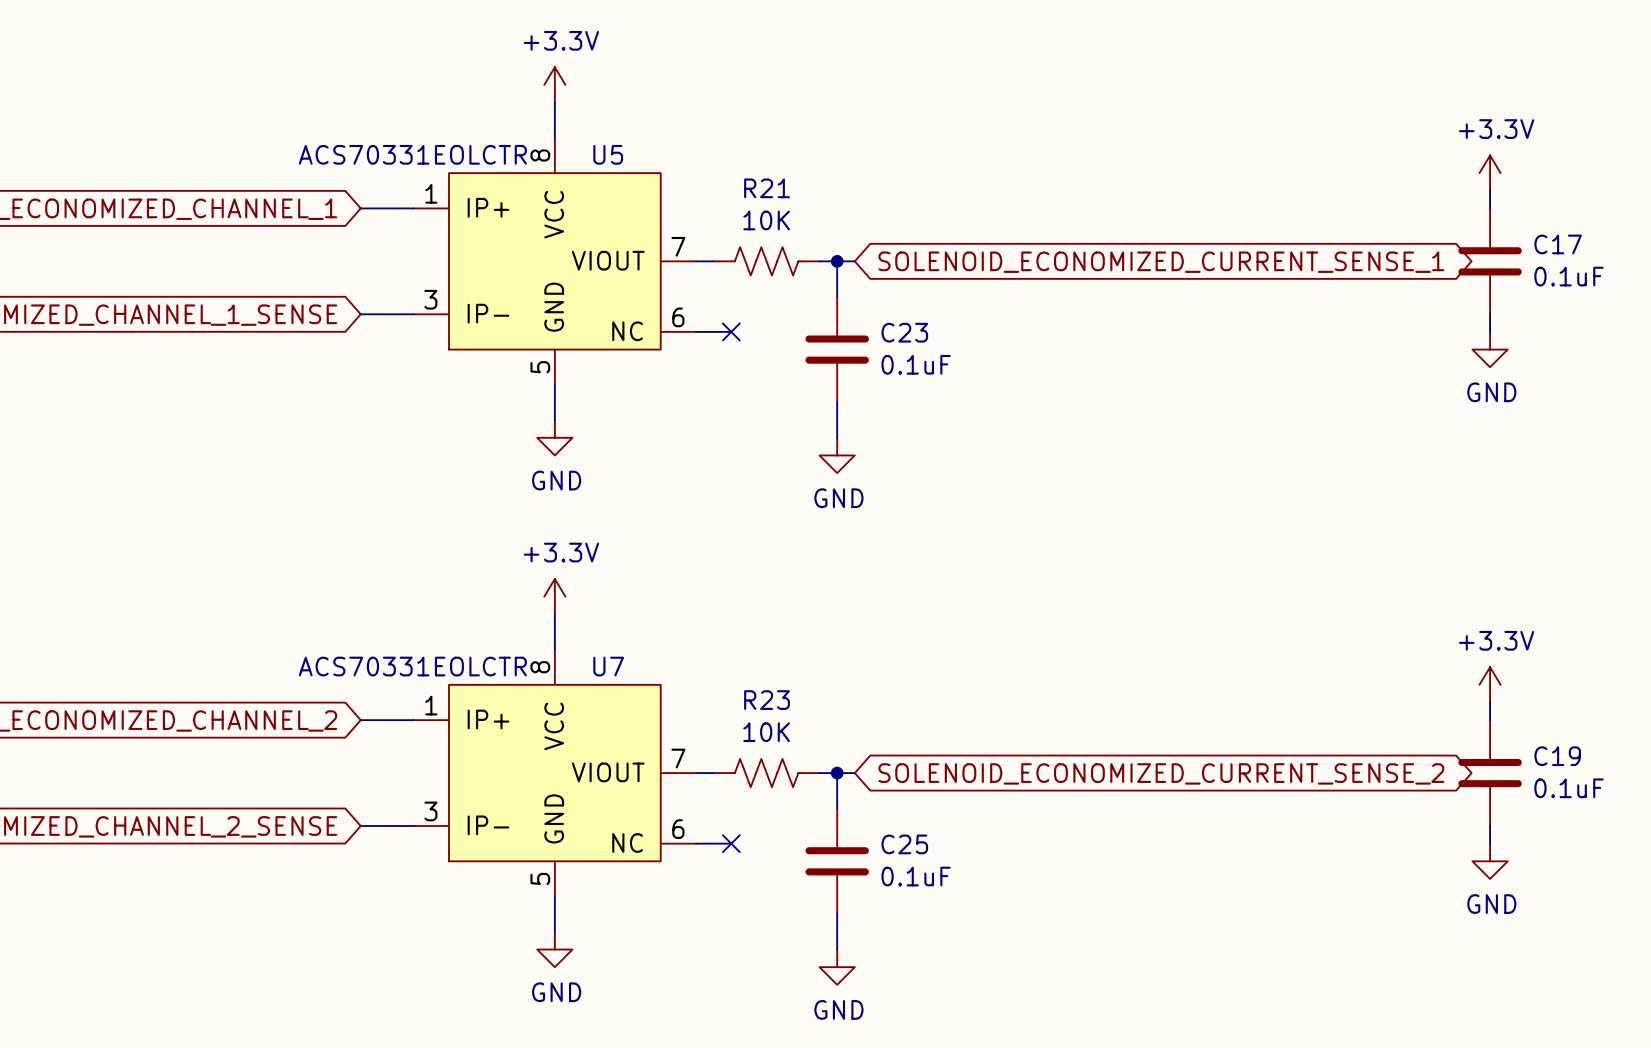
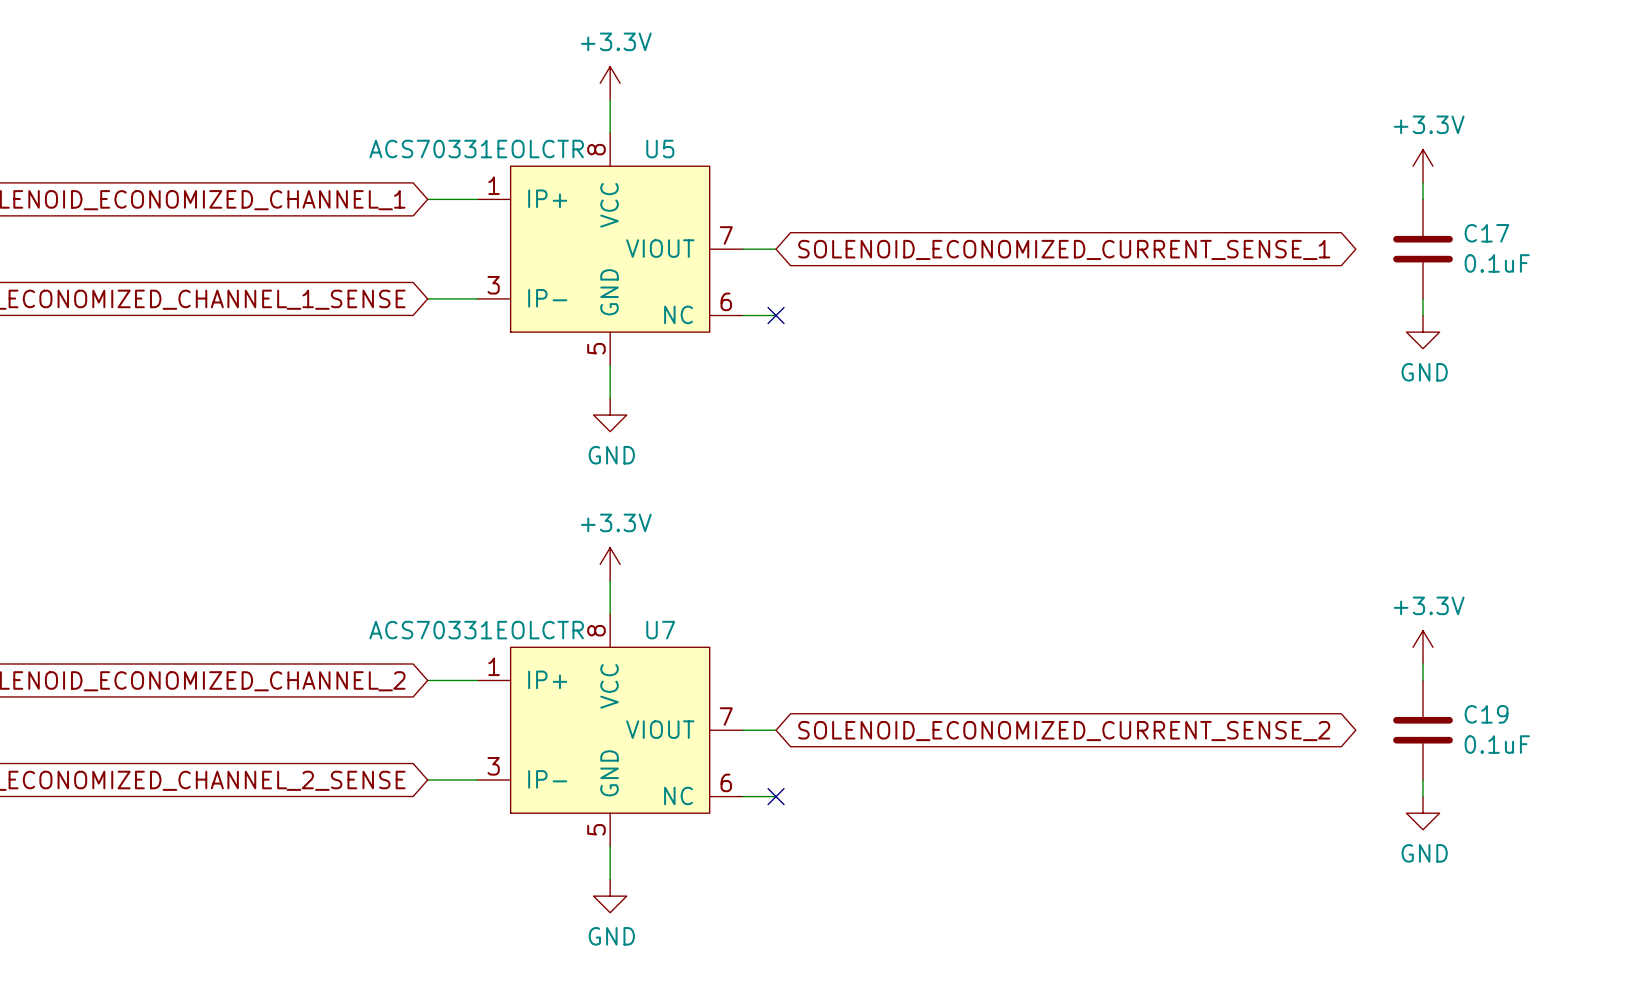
power symbol position: +3.3V (1490, 173) -> +3.3V (1423, 166)
wire: (1490, 190) (1490, 208) -> (1423, 182) (1423, 199)
R21: 10K (766, 261) -> none
wire: (819, 261) (854, 261) -> none
wire: (837, 261) (837, 296) -> none
junction: (837, 261) -> none
C17 position: (1490, 261) -> (1423, 249)
global label position: SOLENOID_ECONOMIZED_CURRENT_SENSE_1 (1161, 262) -> SOLENOID_ECONOMIZED_CURRENT_SENSE_1 (1064, 249)
wire: (1490, 314) (1490, 331) -> (1423, 298) (1423, 315)
C23: 0.1uF (837, 349) -> none
power symbol position: GND (1490, 349) -> GND (1423, 332)
wire: (837, 402) (837, 437) -> none
power symbol: GND (837, 455) -> none
power symbol position: +3.3V (1490, 684) -> +3.3V (1423, 647)
wire: (1490, 702) (1490, 720) -> (1423, 663) (1423, 680)
R23: 10K (766, 773) -> none
wire: (819, 773) (854, 773) -> none
wire: (837, 773) (837, 808) -> none
junction: (837, 773) -> none
global label position: SOLENOID_ECONOMIZED_CURRENT_SENSE_2 (1161, 773) -> SOLENOID_ECONOMIZED_CURRENT_SENSE_2 (1064, 731)
C19 position: (1490, 773) -> (1423, 730)
wire: (1490, 826) (1490, 843) -> (1423, 780) (1423, 796)
C25: 0.1uF (837, 861) -> none
power symbol position: GND (1490, 861) -> GND (1423, 813)
wire: (837, 914) (837, 949) -> none
power symbol: GND (837, 967) -> none

